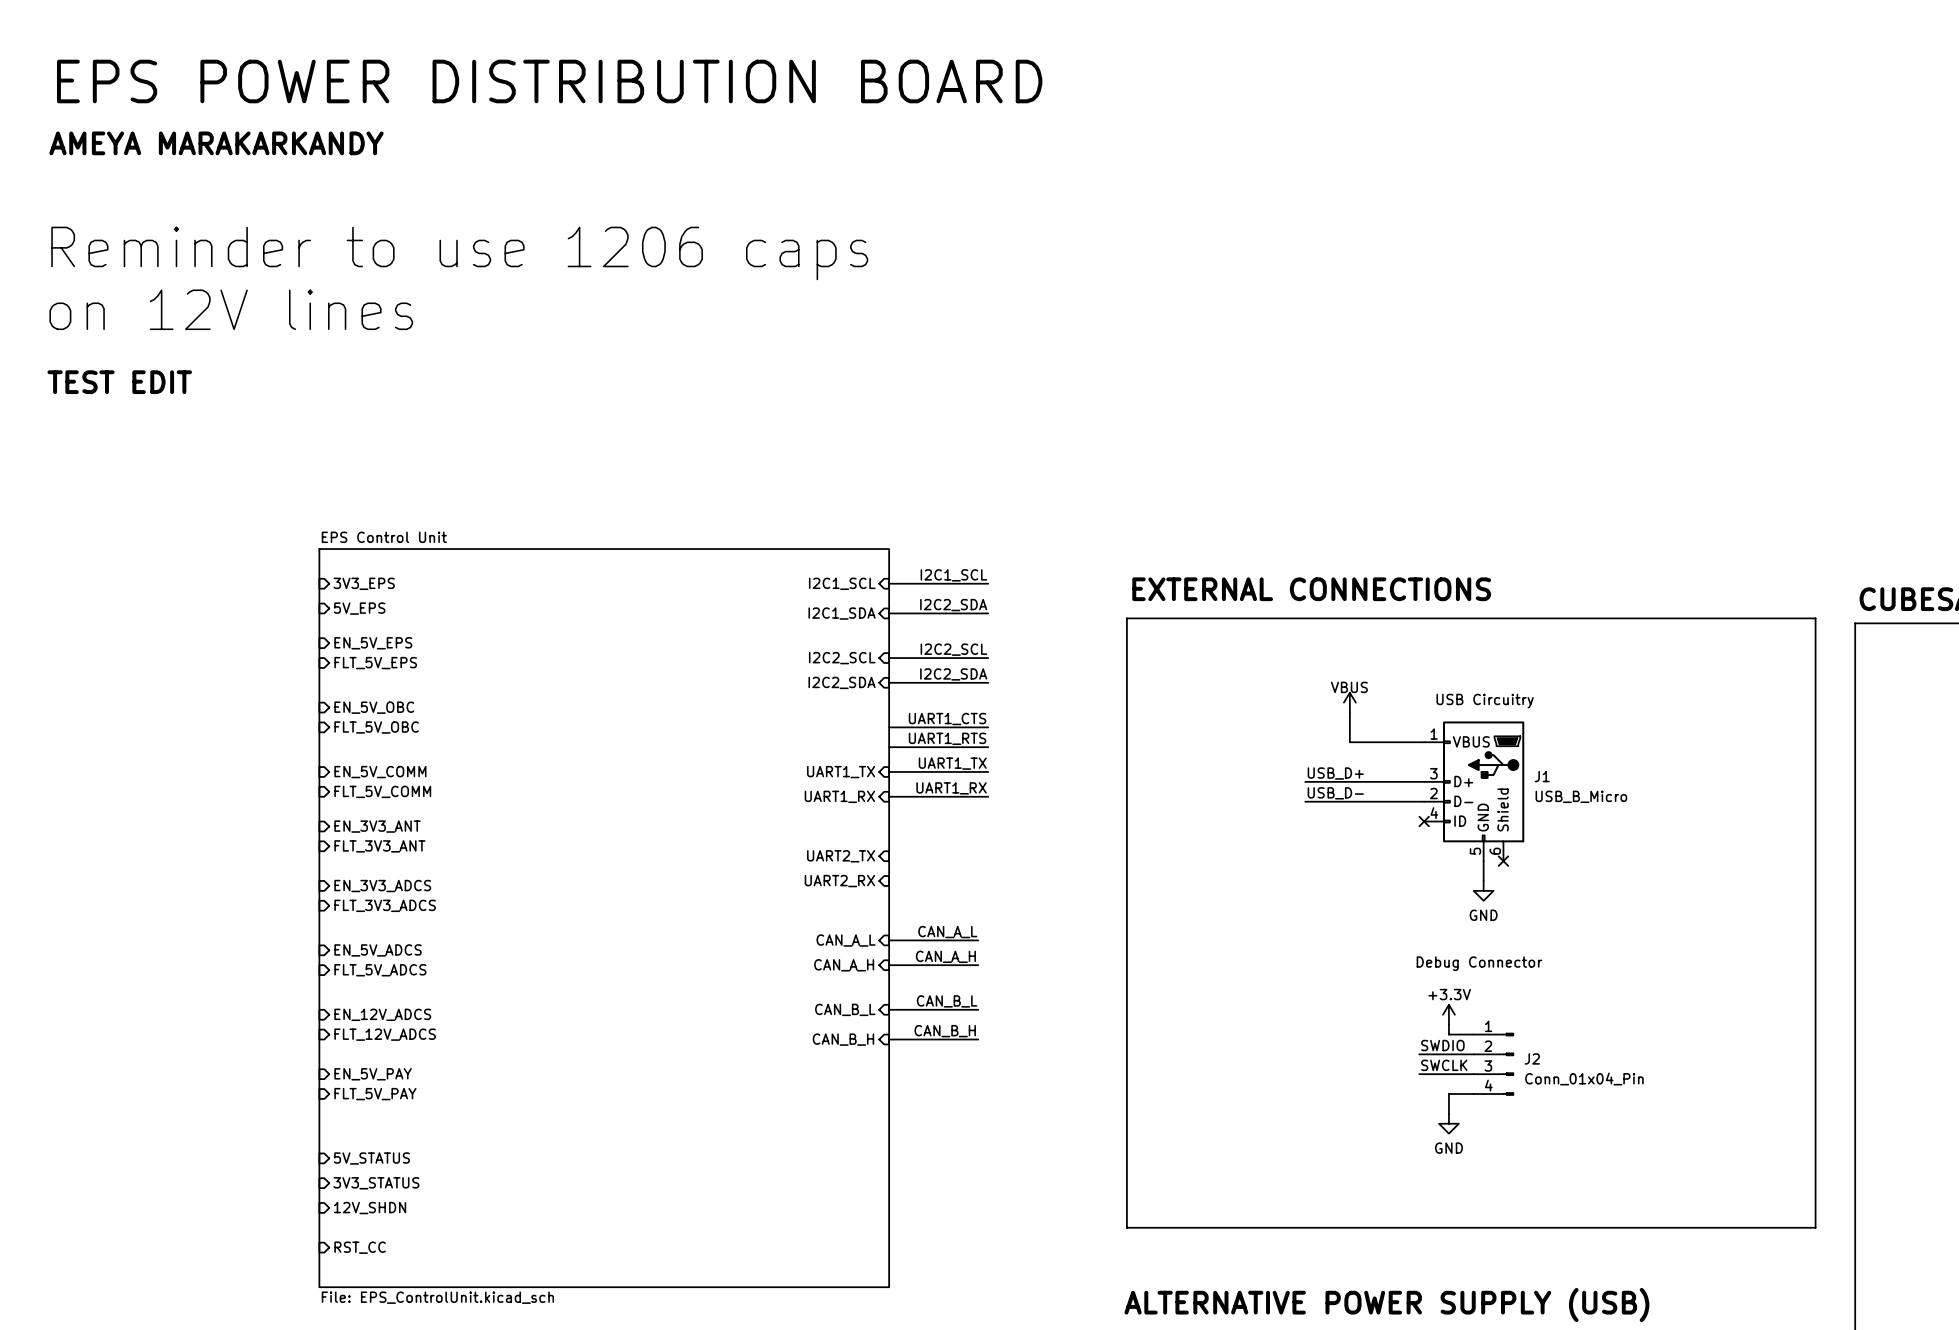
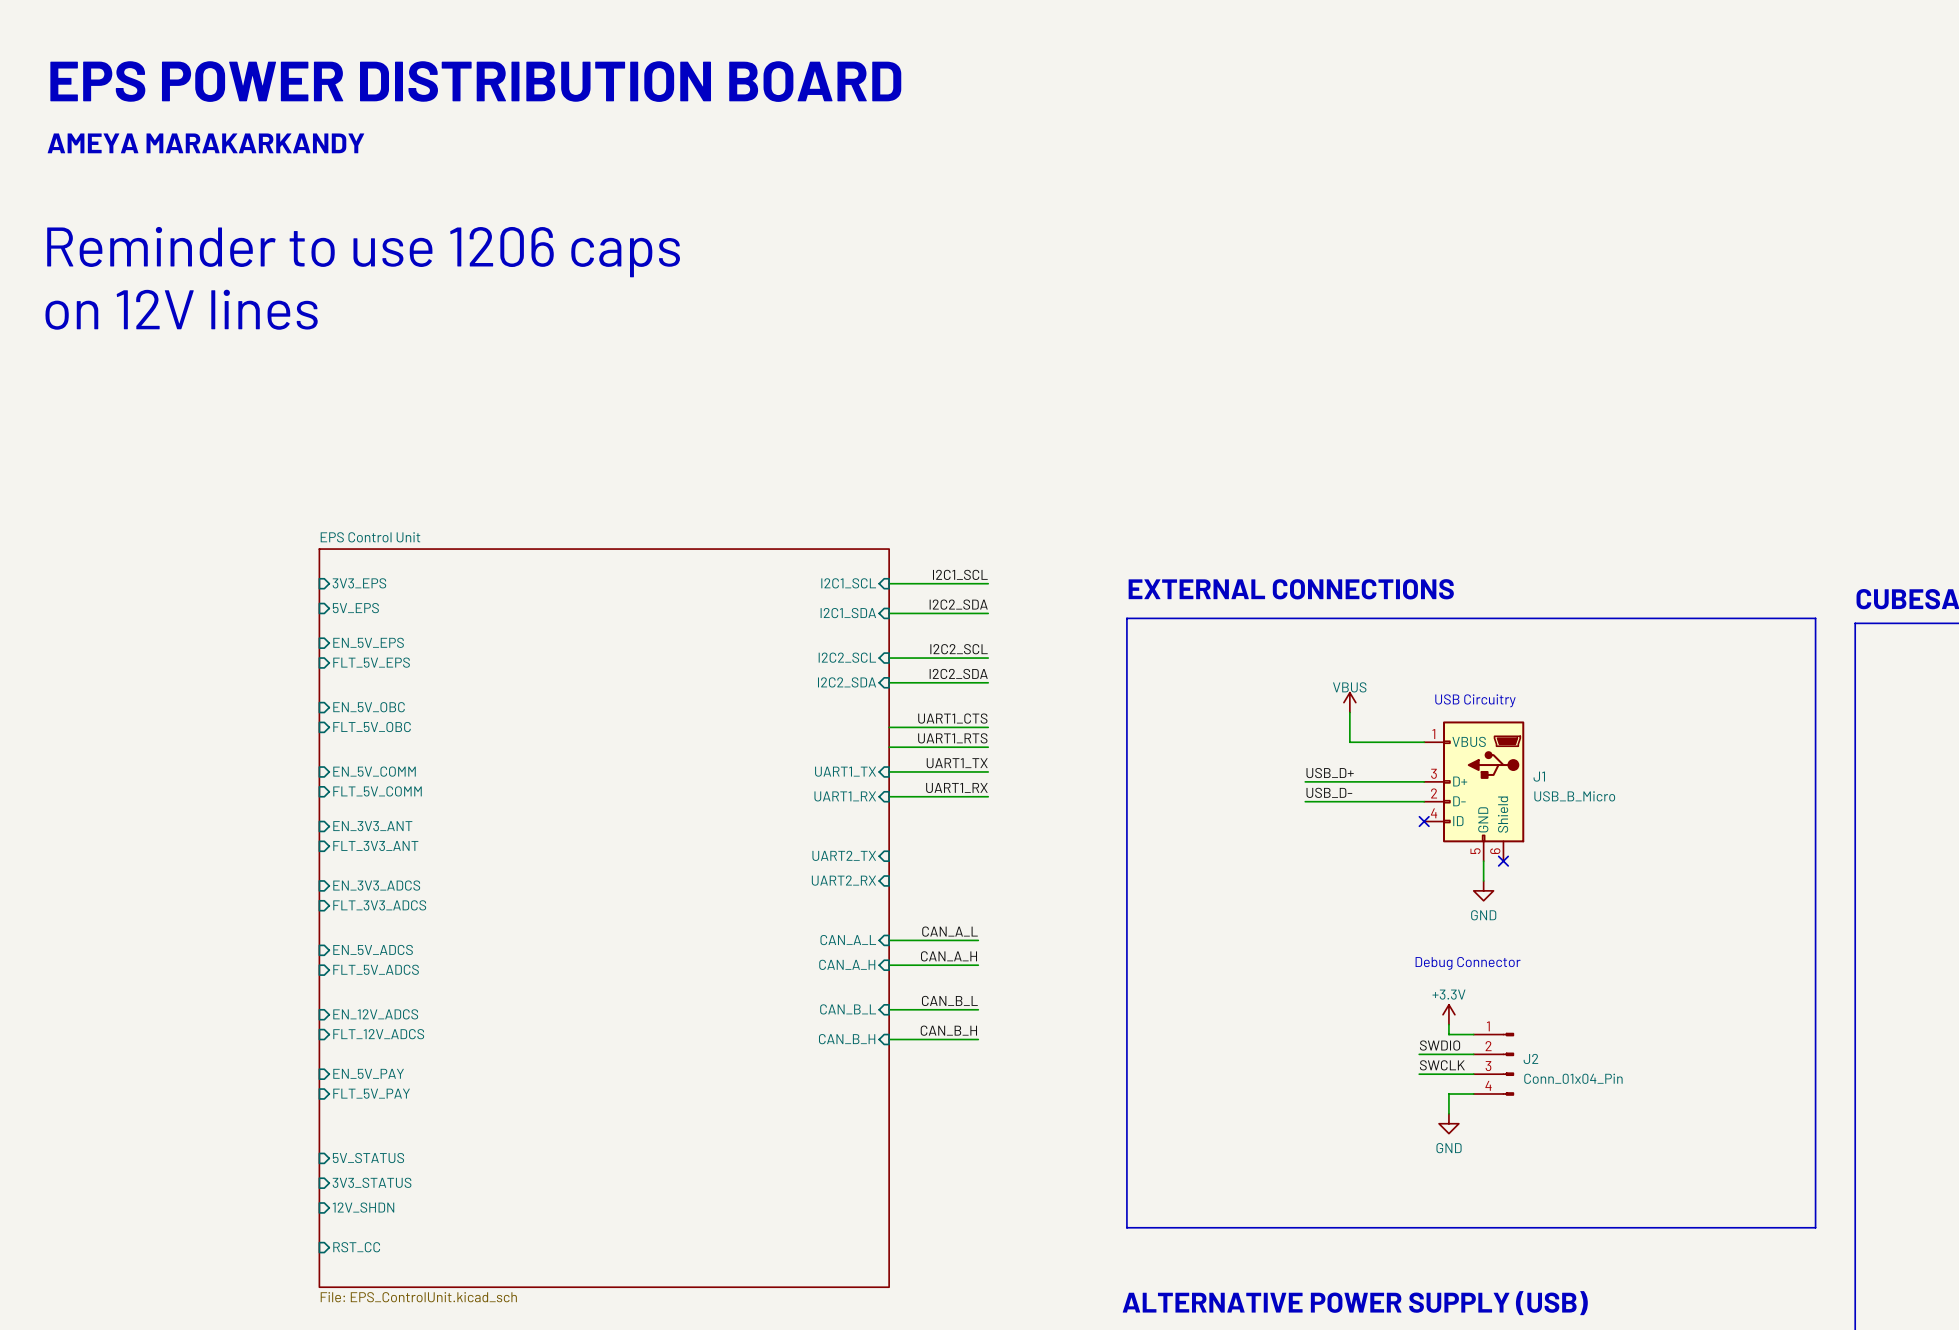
text: TEST EDIT (119, 382) -> none

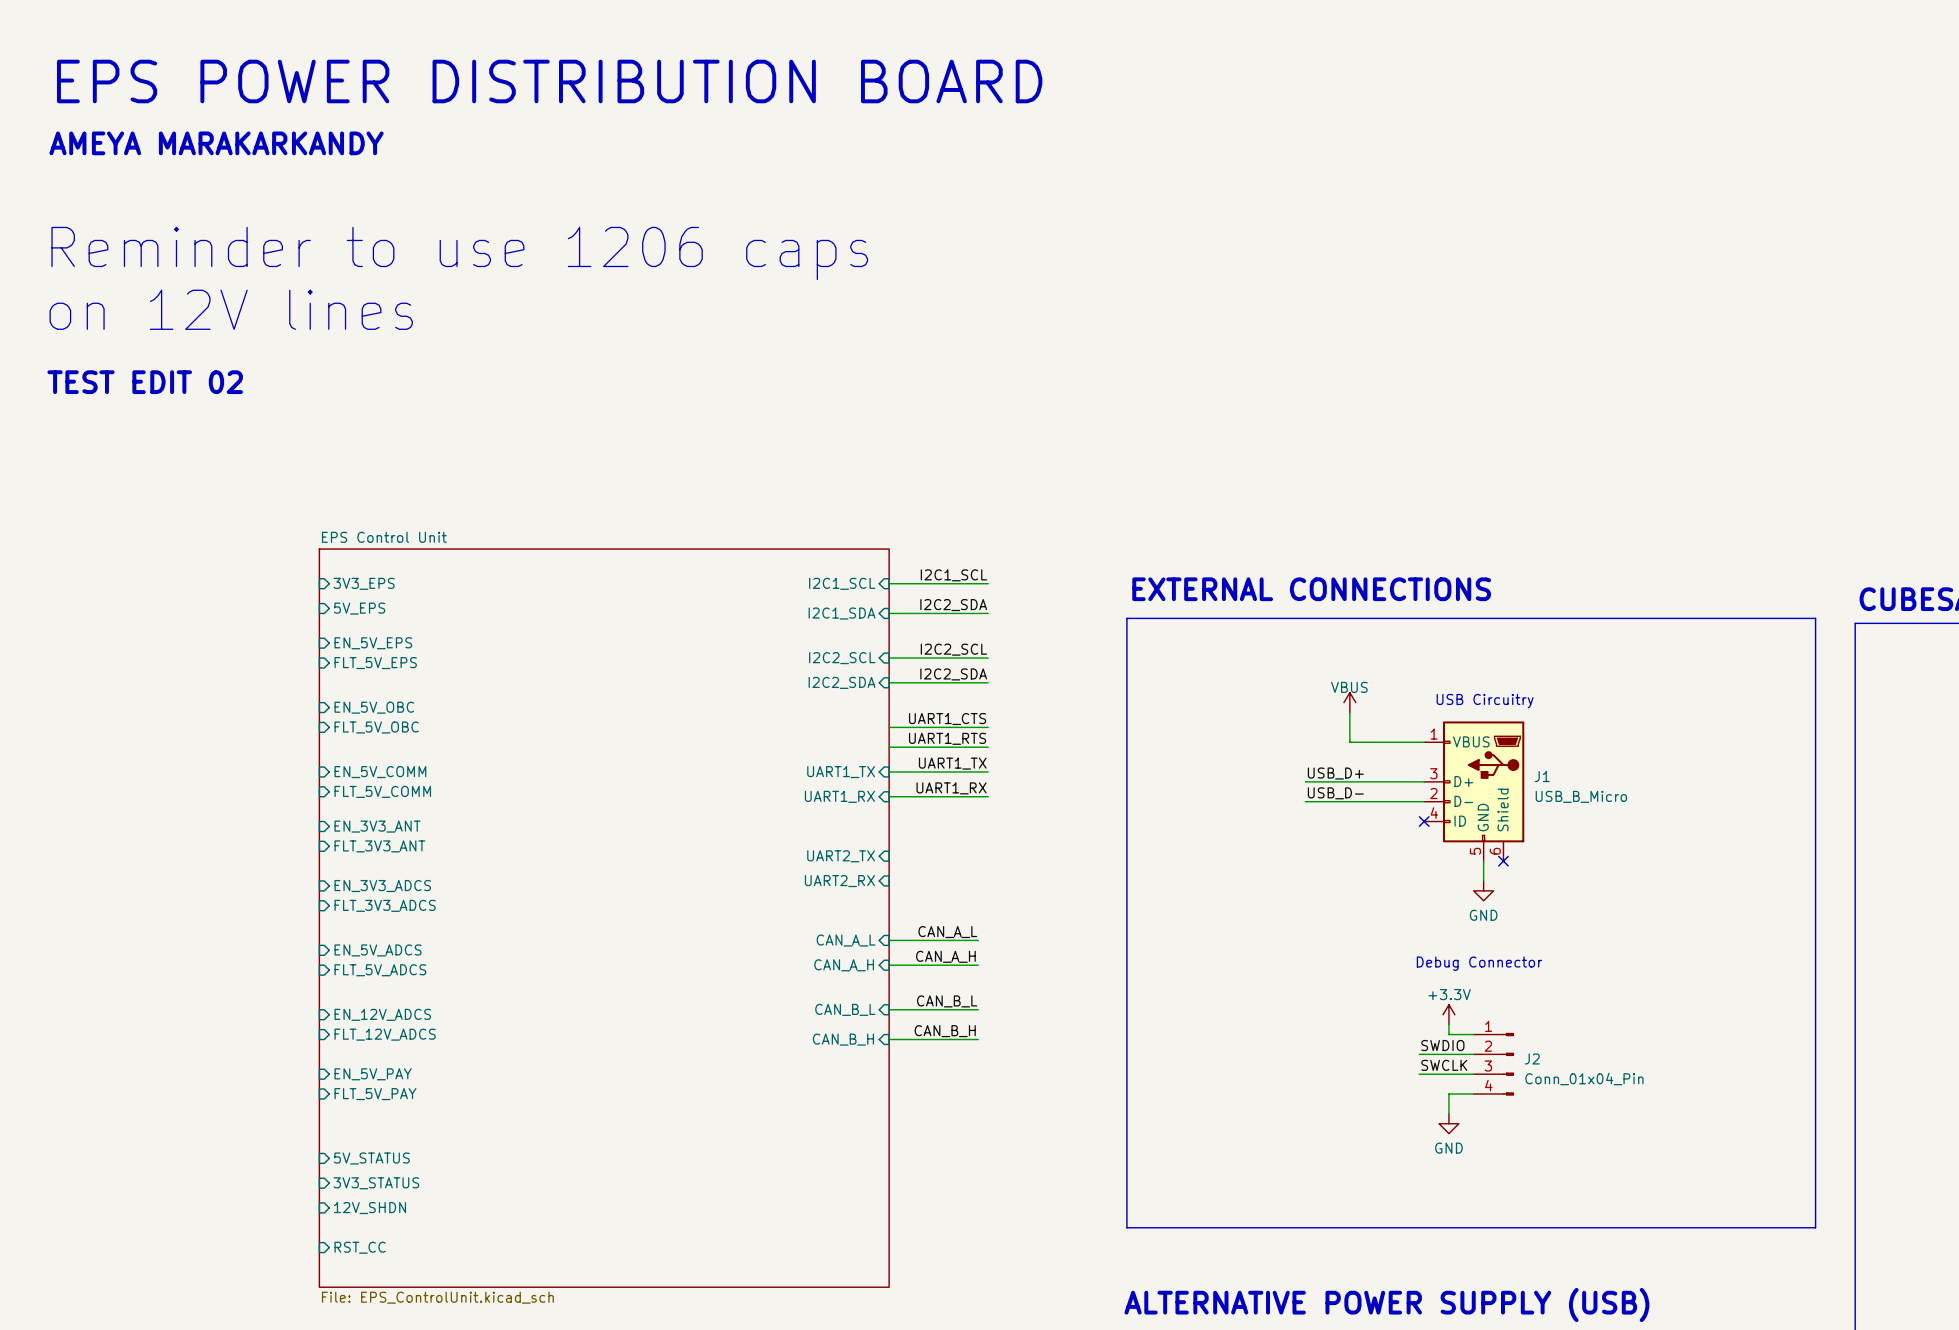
text: none -> TEST EDIT 02 (145, 382)

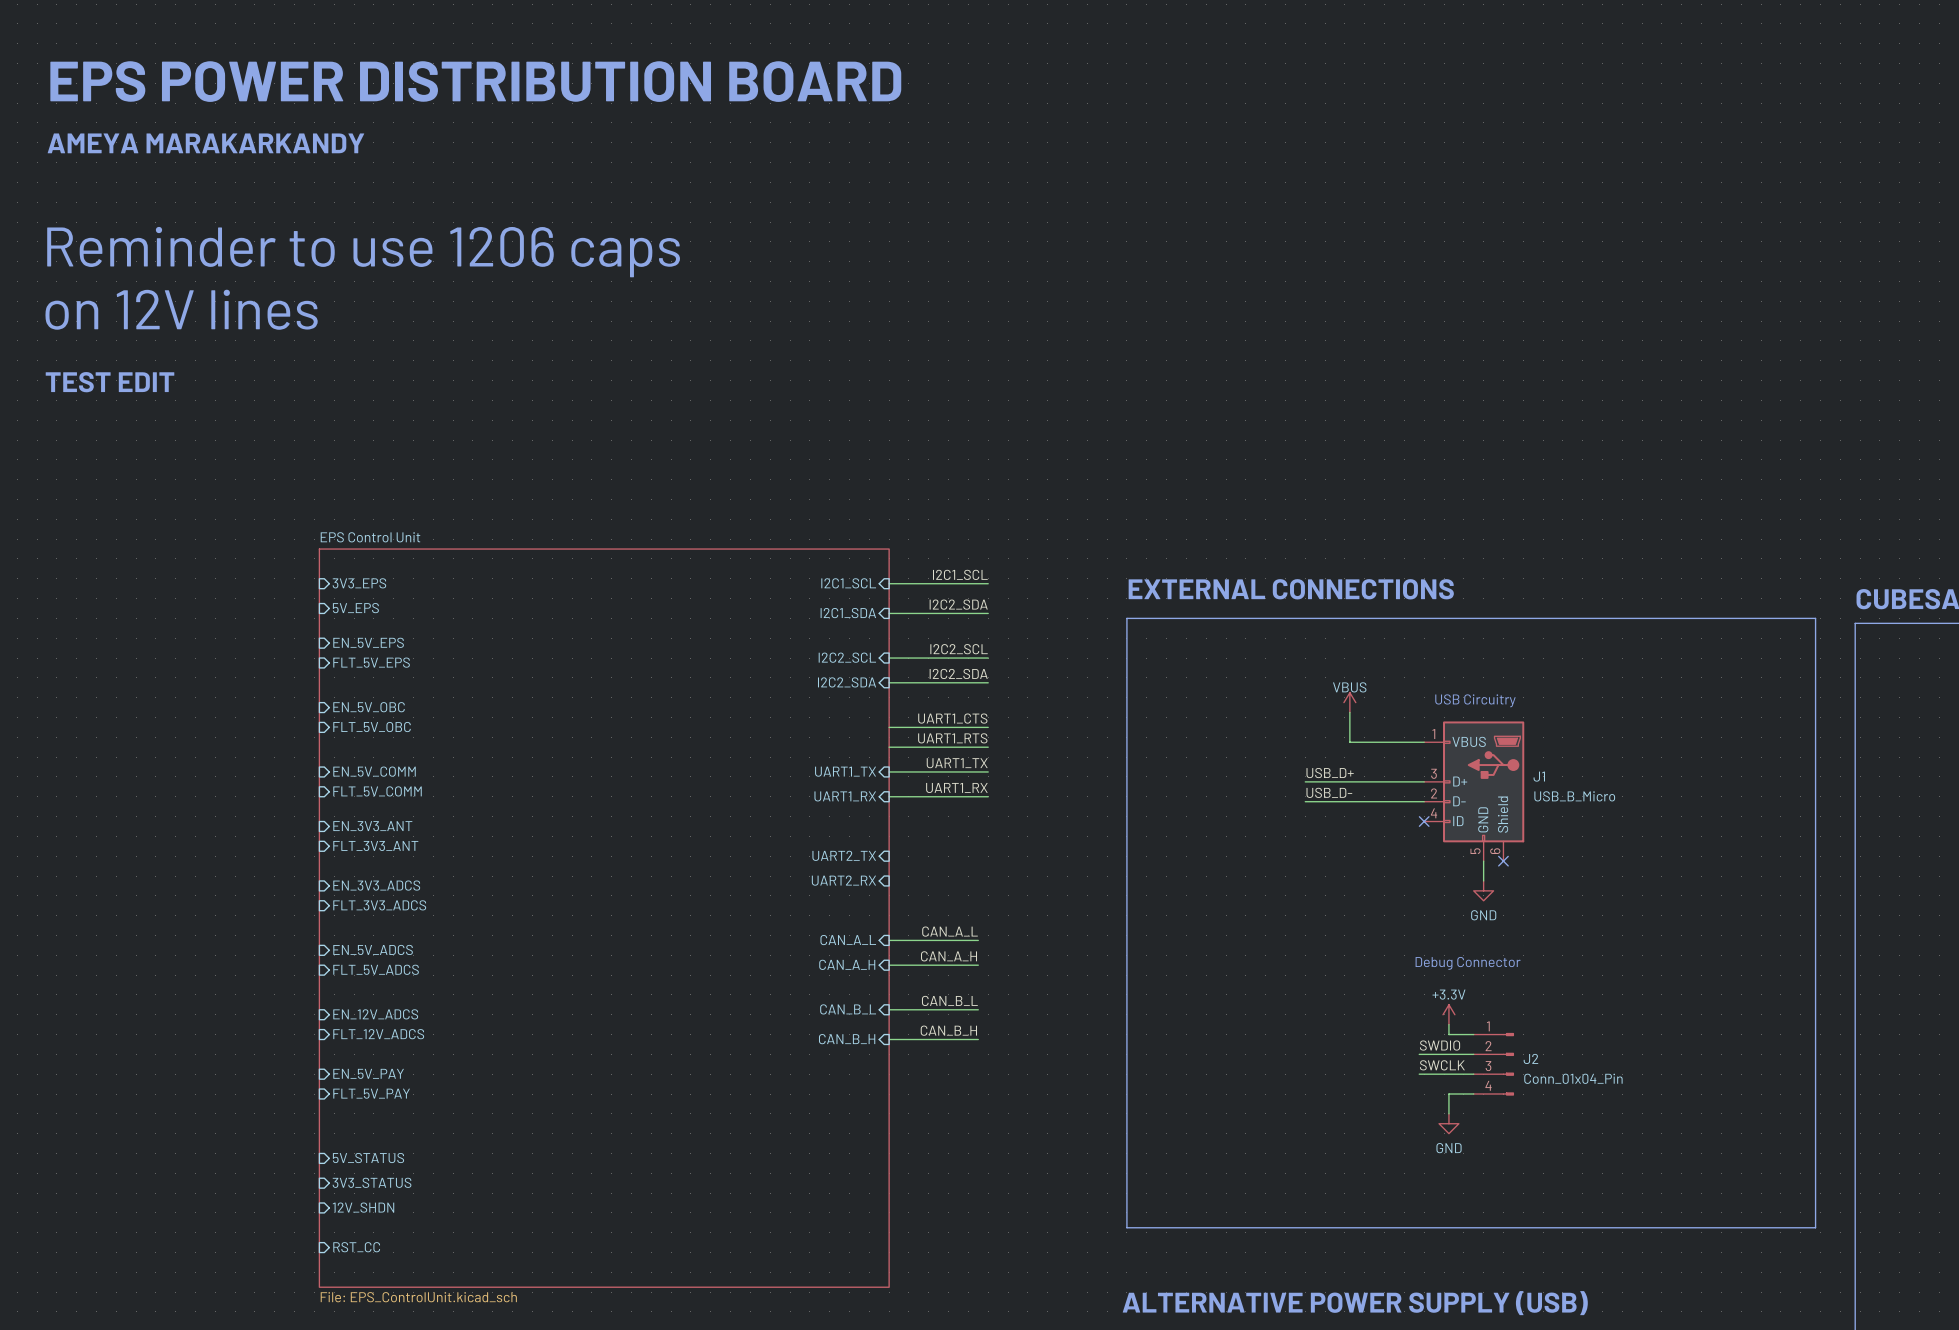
text: TEST EDIT 02 (145, 382) -> TEST EDIT (110, 382)

